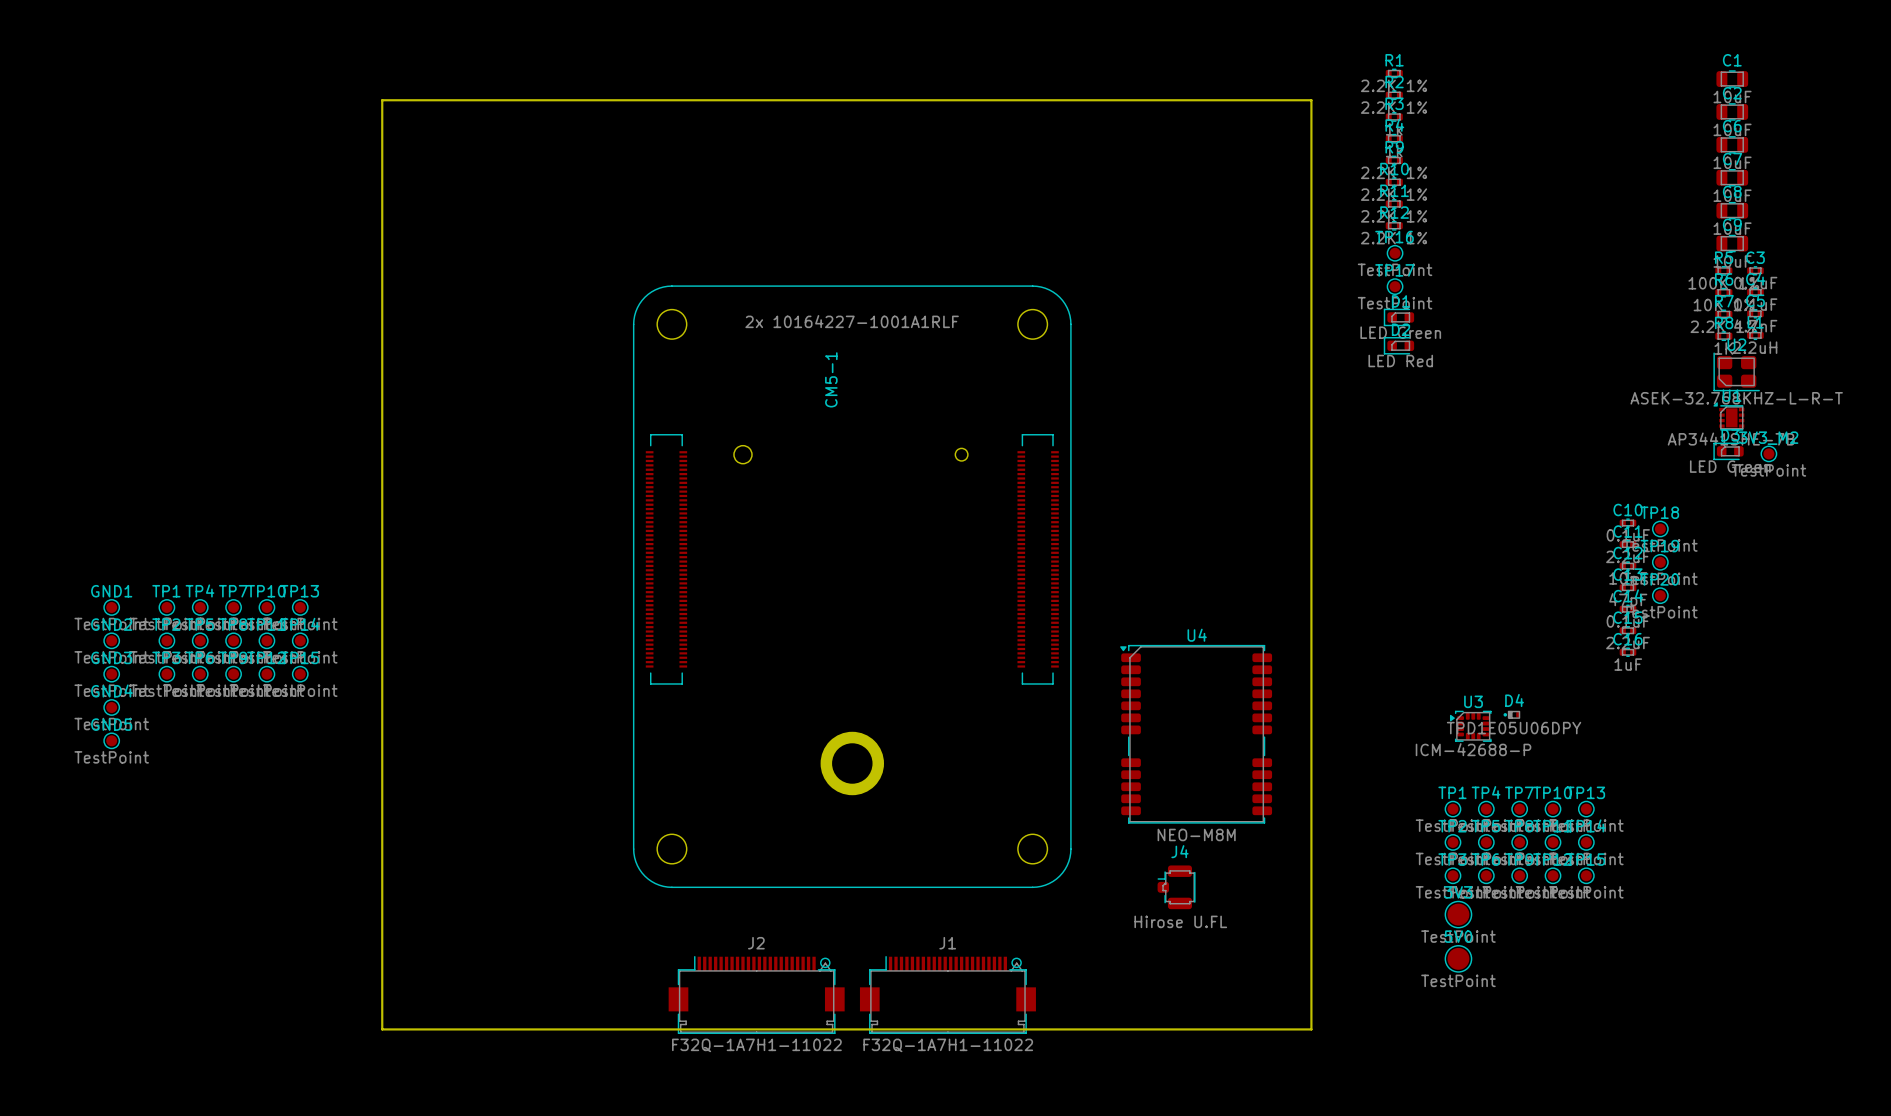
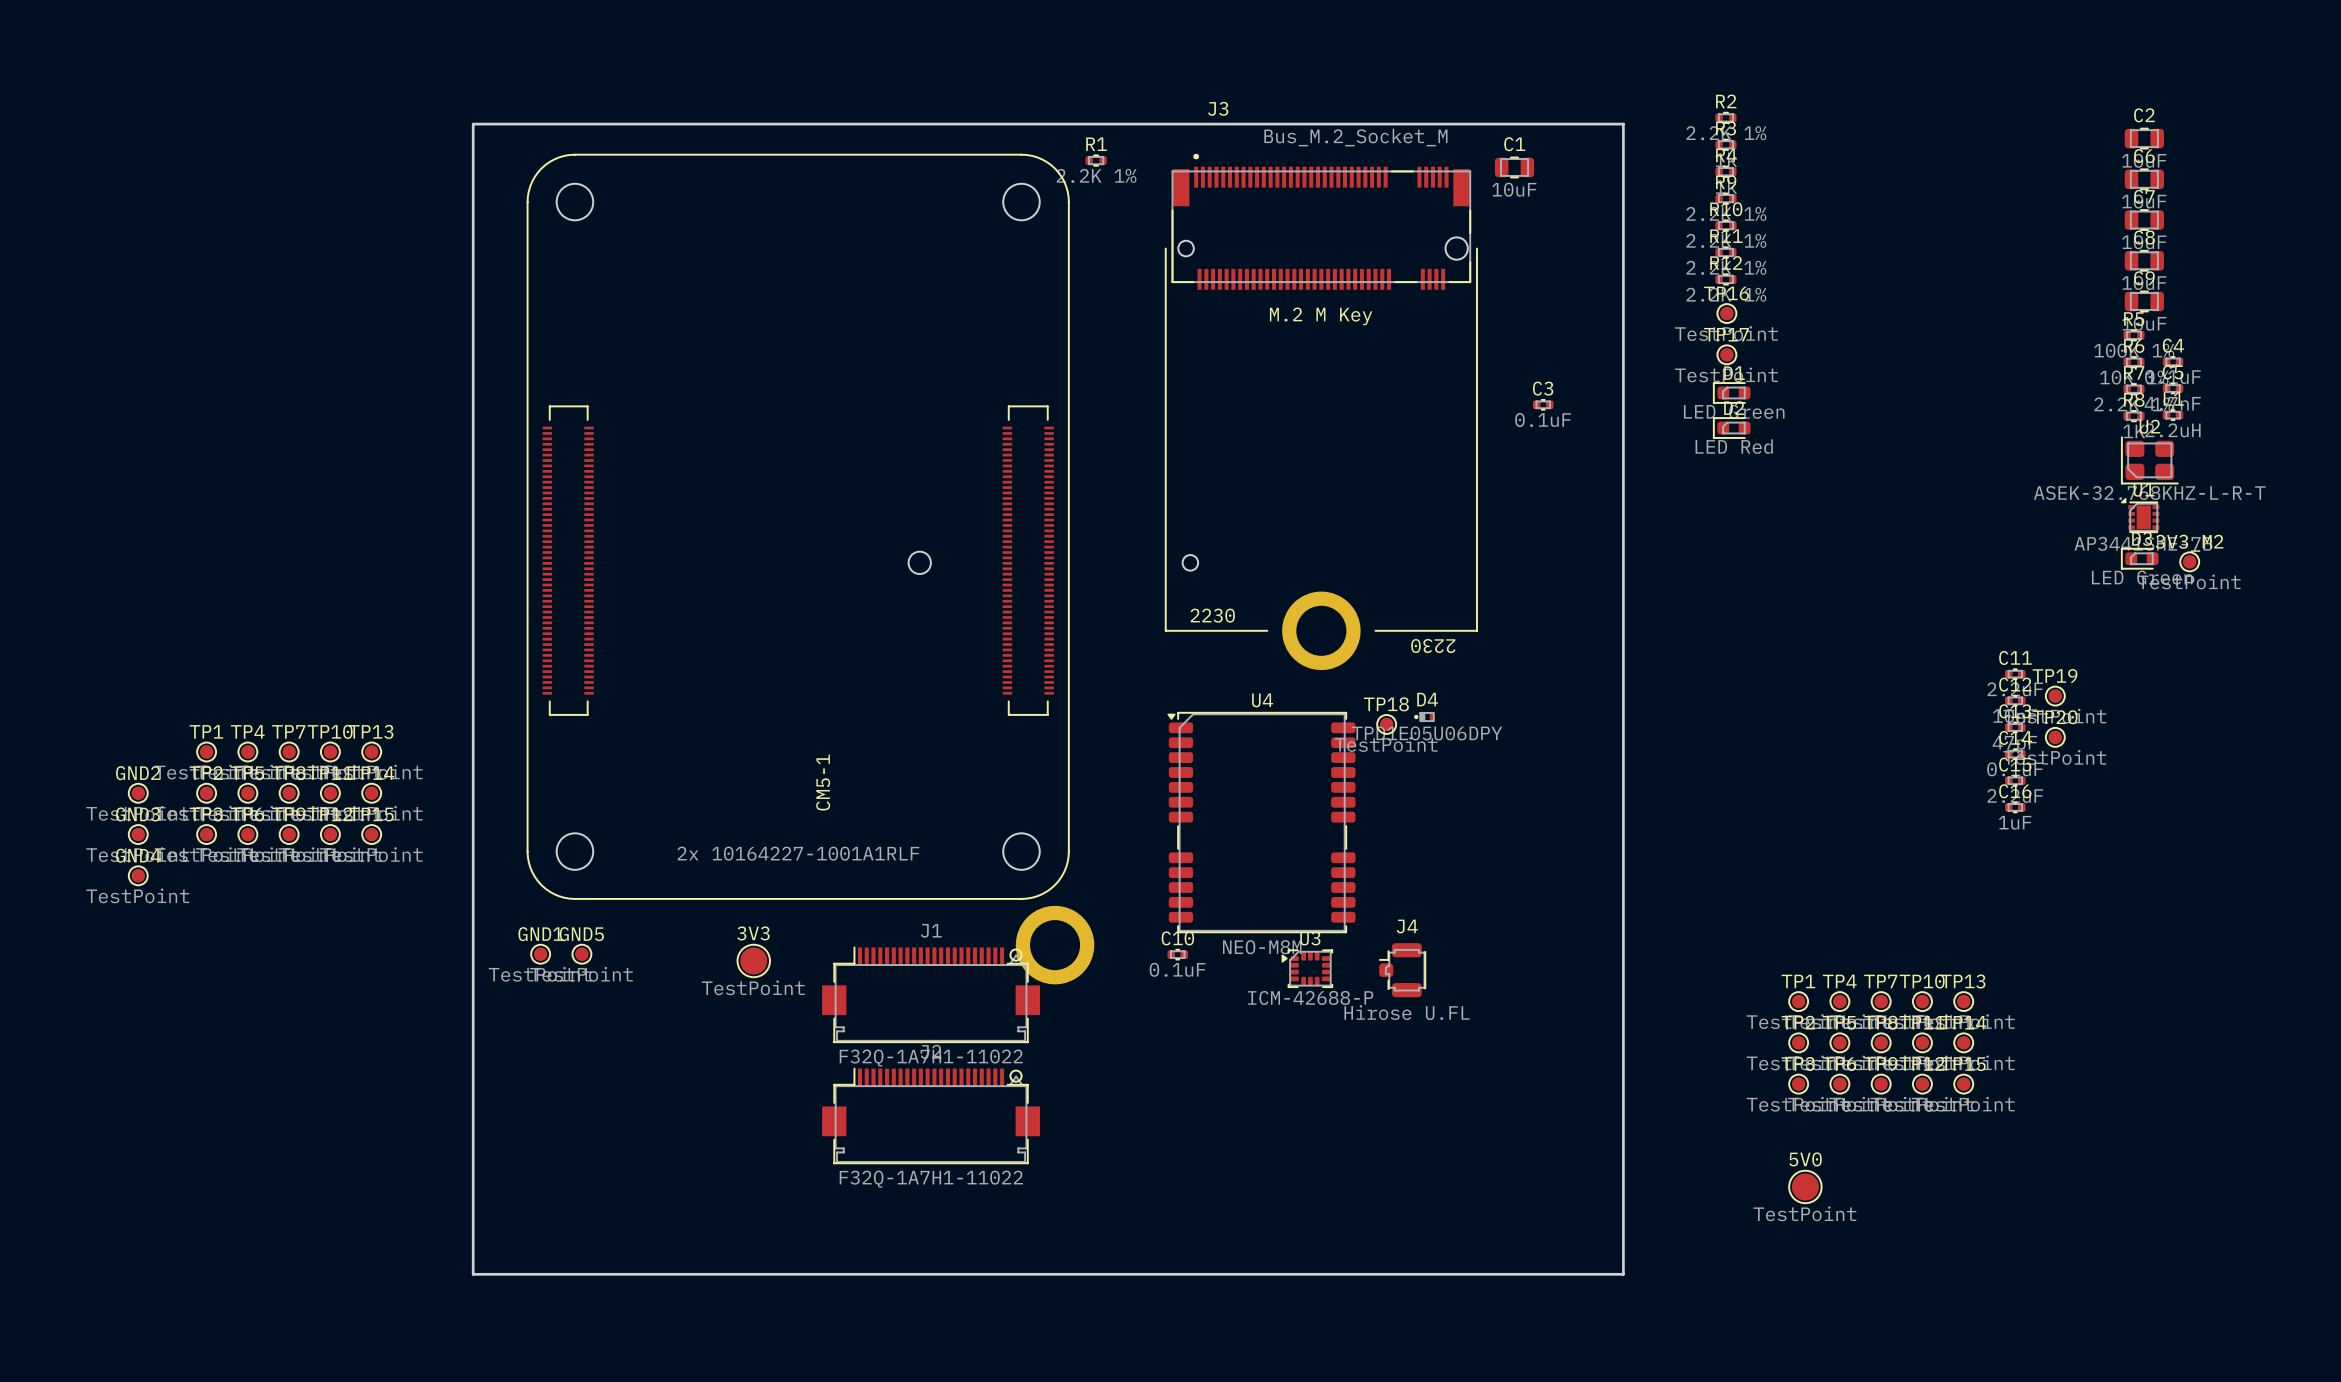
R1 position: (1394, 73) -> (1096, 160)
C1 position: (1732, 79) -> (1514, 167)
C3 position: (1755, 270) -> (1543, 404)
J3: none -> Bus_M.2_Socket_M (1321, 411)
C10 position: (1628, 523) -> (1177, 954)
TP18 position: (1660, 528) -> (1386, 724)
CM5-1 rotation: 0° (852, 586) -> 180° (798, 526)
GND1 position: (111, 607) -> (540, 954)
D4 position: (1511, 714) -> (1424, 717)
U3 position: (1470, 726) -> (1307, 968)
U4 position: (1196, 734) -> (1261, 822)
GND5 position: (111, 740) -> (581, 954)
J4 position: (1176, 887) -> (1402, 970)
3V3 position: (1458, 914) -> (753, 960)
J2 position: (756, 994) -> (931, 1115)
J1 position: (947, 994) -> (931, 994)

